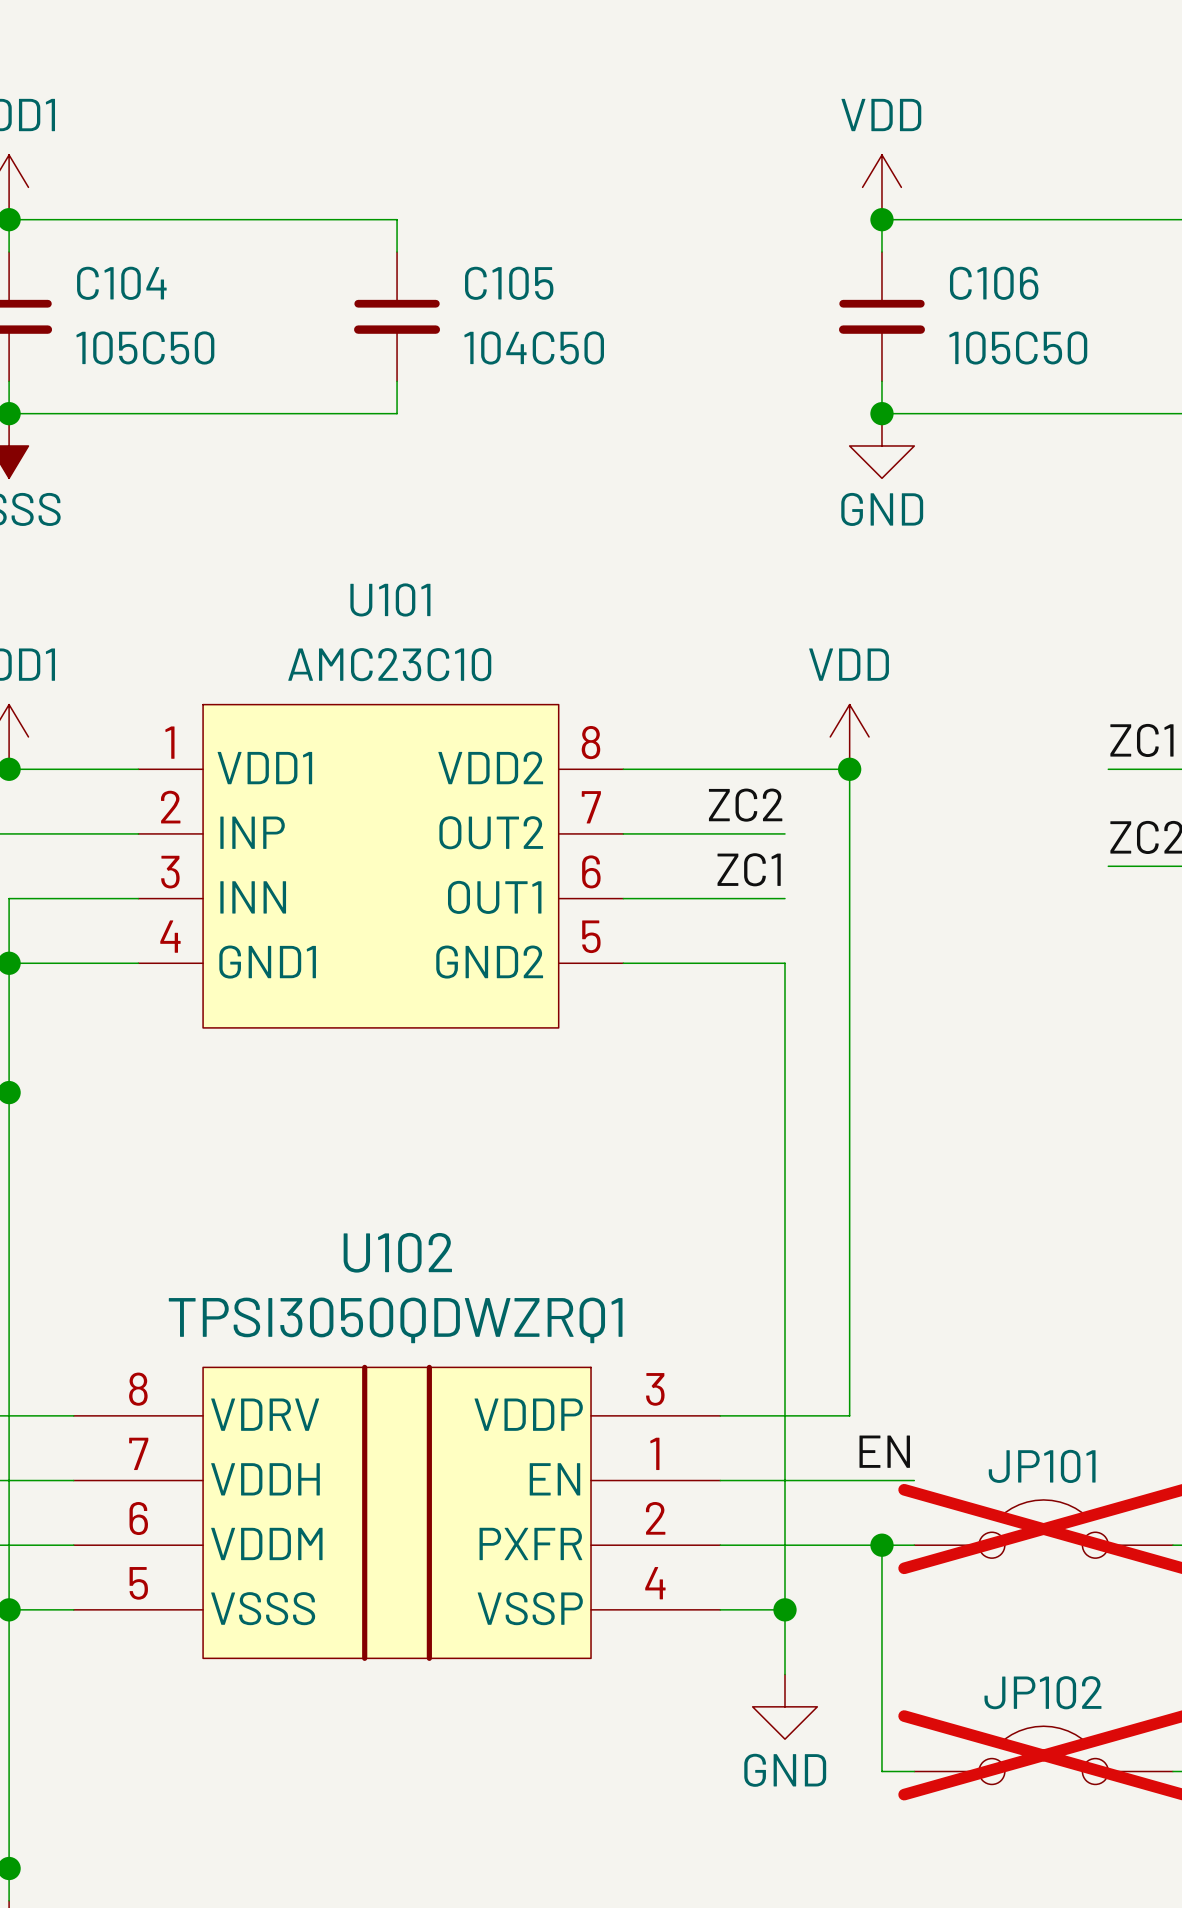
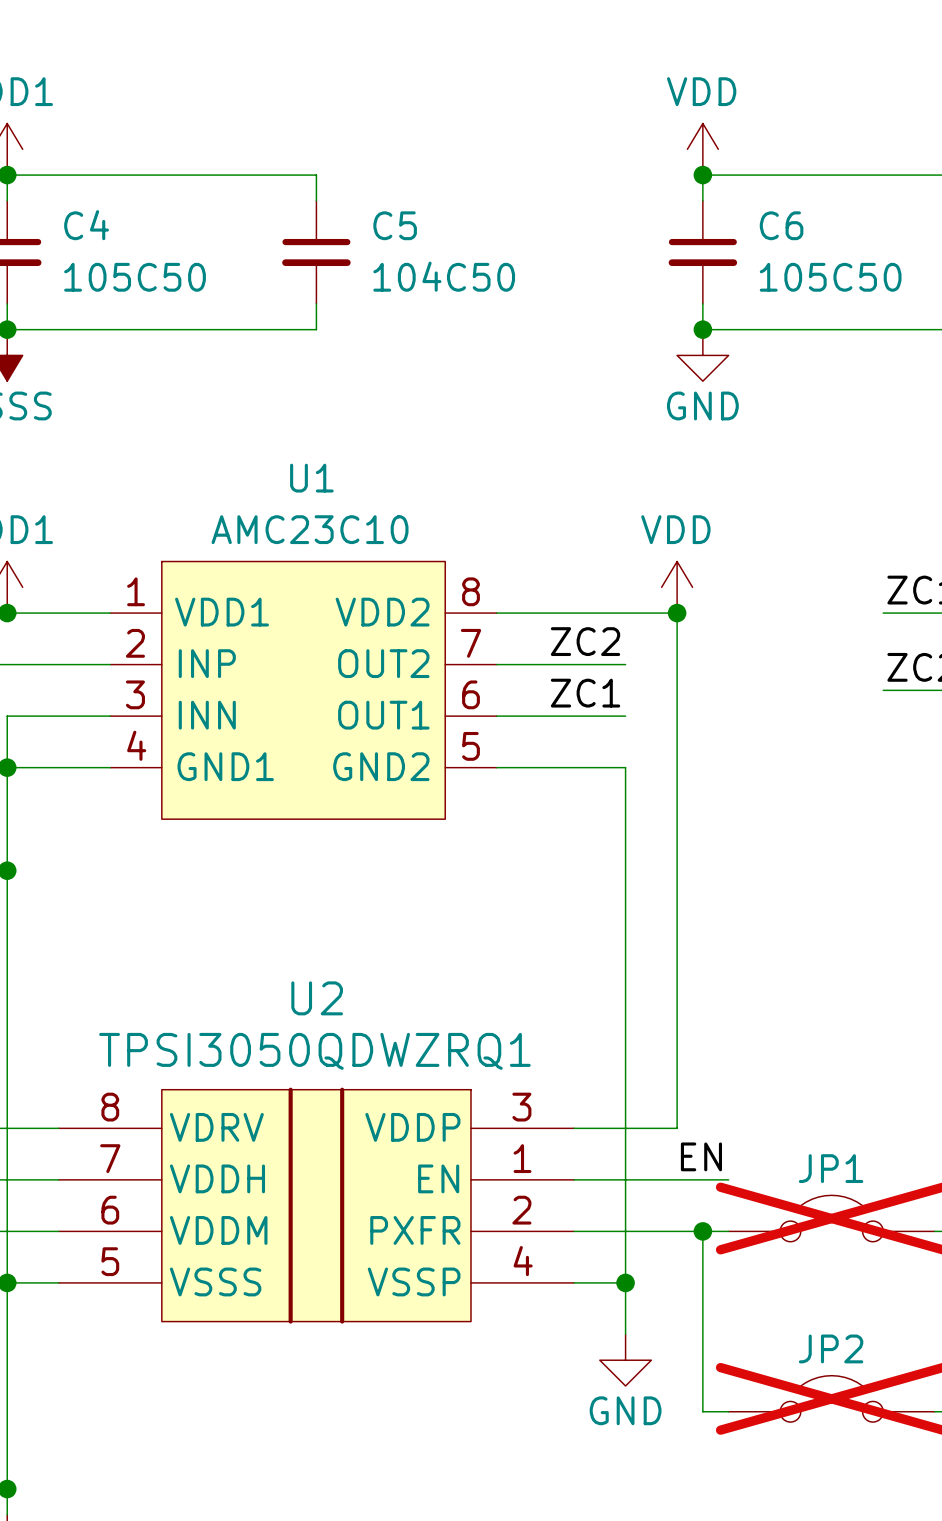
C104 name: C104 (121, 283) -> C4 (86, 225)
C105 name: C105 (509, 283) -> C5 (395, 225)
C106 name: C106 (994, 283) -> C6 (781, 225)
U101 name: U101 (390, 599) -> U1 (311, 478)
U102 name: U102 (397, 1252) -> U2 (317, 998)
JP101 name: JP101 (1042, 1466) -> JP1 (831, 1168)
JP102 name: JP102 (1042, 1692) -> JP2 (831, 1348)

